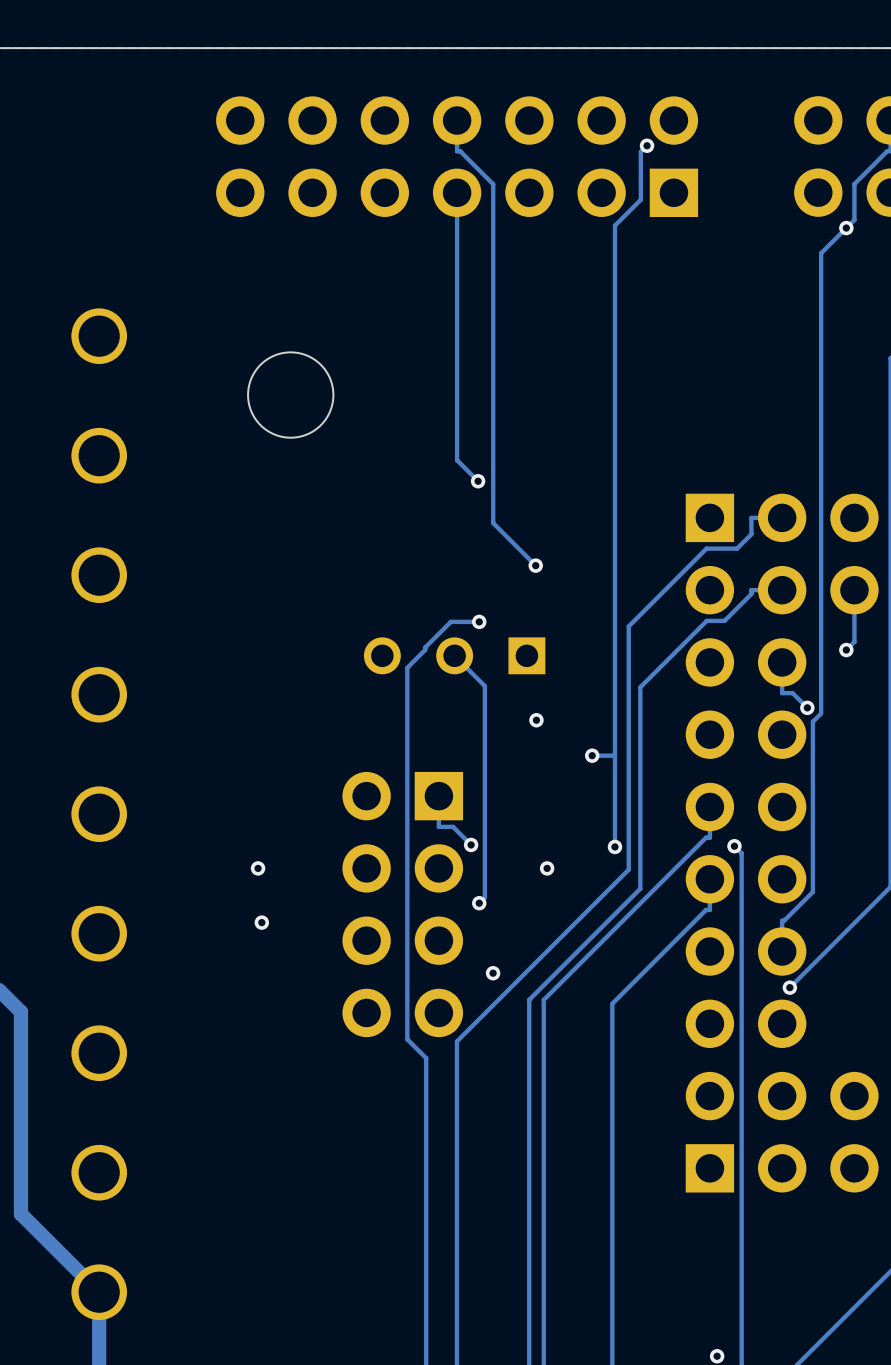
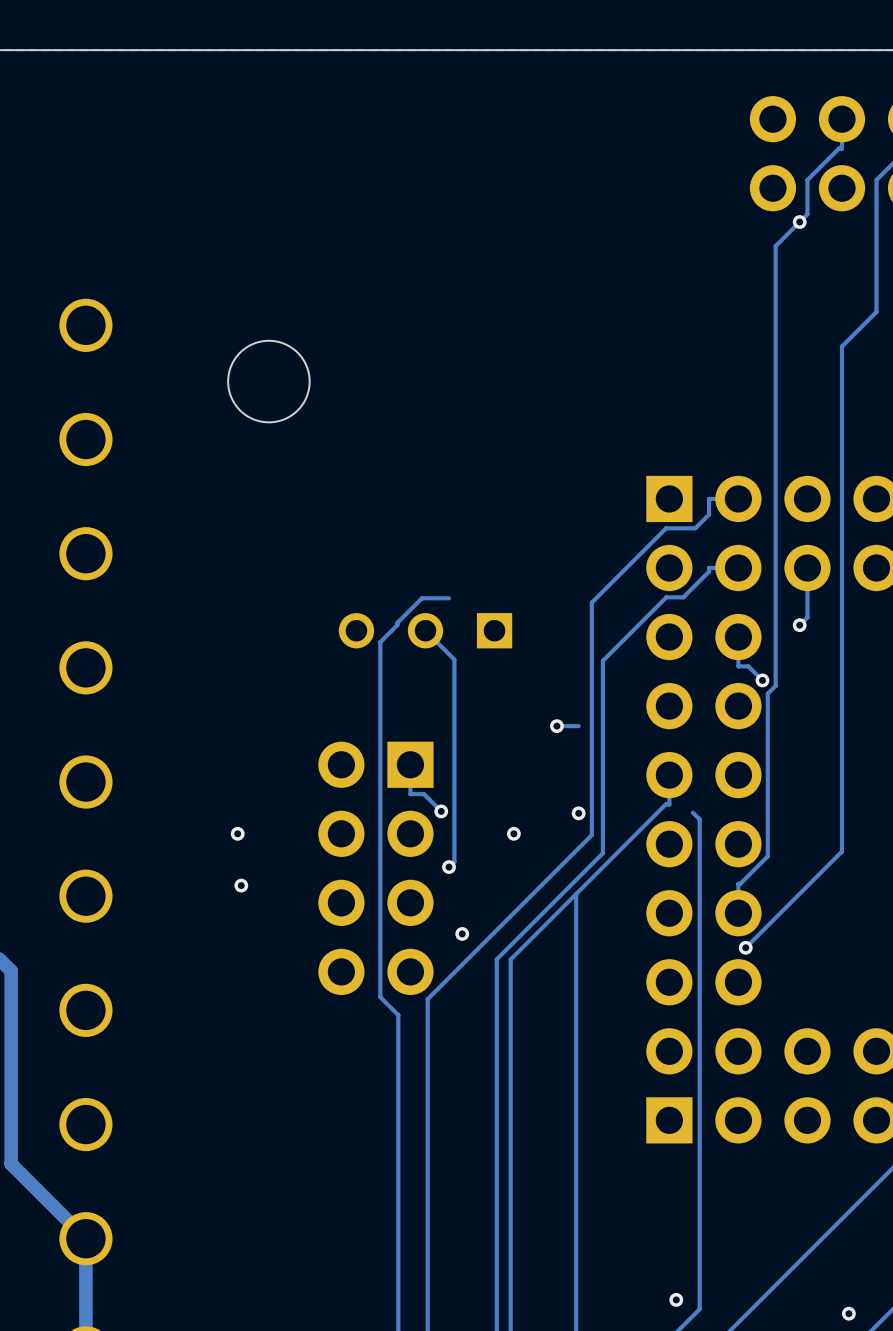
track: (457, 120) (457, 151) (460, 151) (493, 184) (493, 523) (535, 565) -> none
track: (647, 145) (640, 151) (640, 199) (614, 225) (614, 846) -> none
via: (647, 145) -> none
part: (457, 156) -> none
track: (457, 192) (457, 460) (478, 481) -> none
via: (478, 481) -> none
via: (535, 565) -> none
via: (479, 621) -> none
via: (536, 720) -> none
via: (734, 846) -> none
track: (709, 879) (709, 909) (706, 909) (612, 1003) -> (576, 894) (576, 963)

